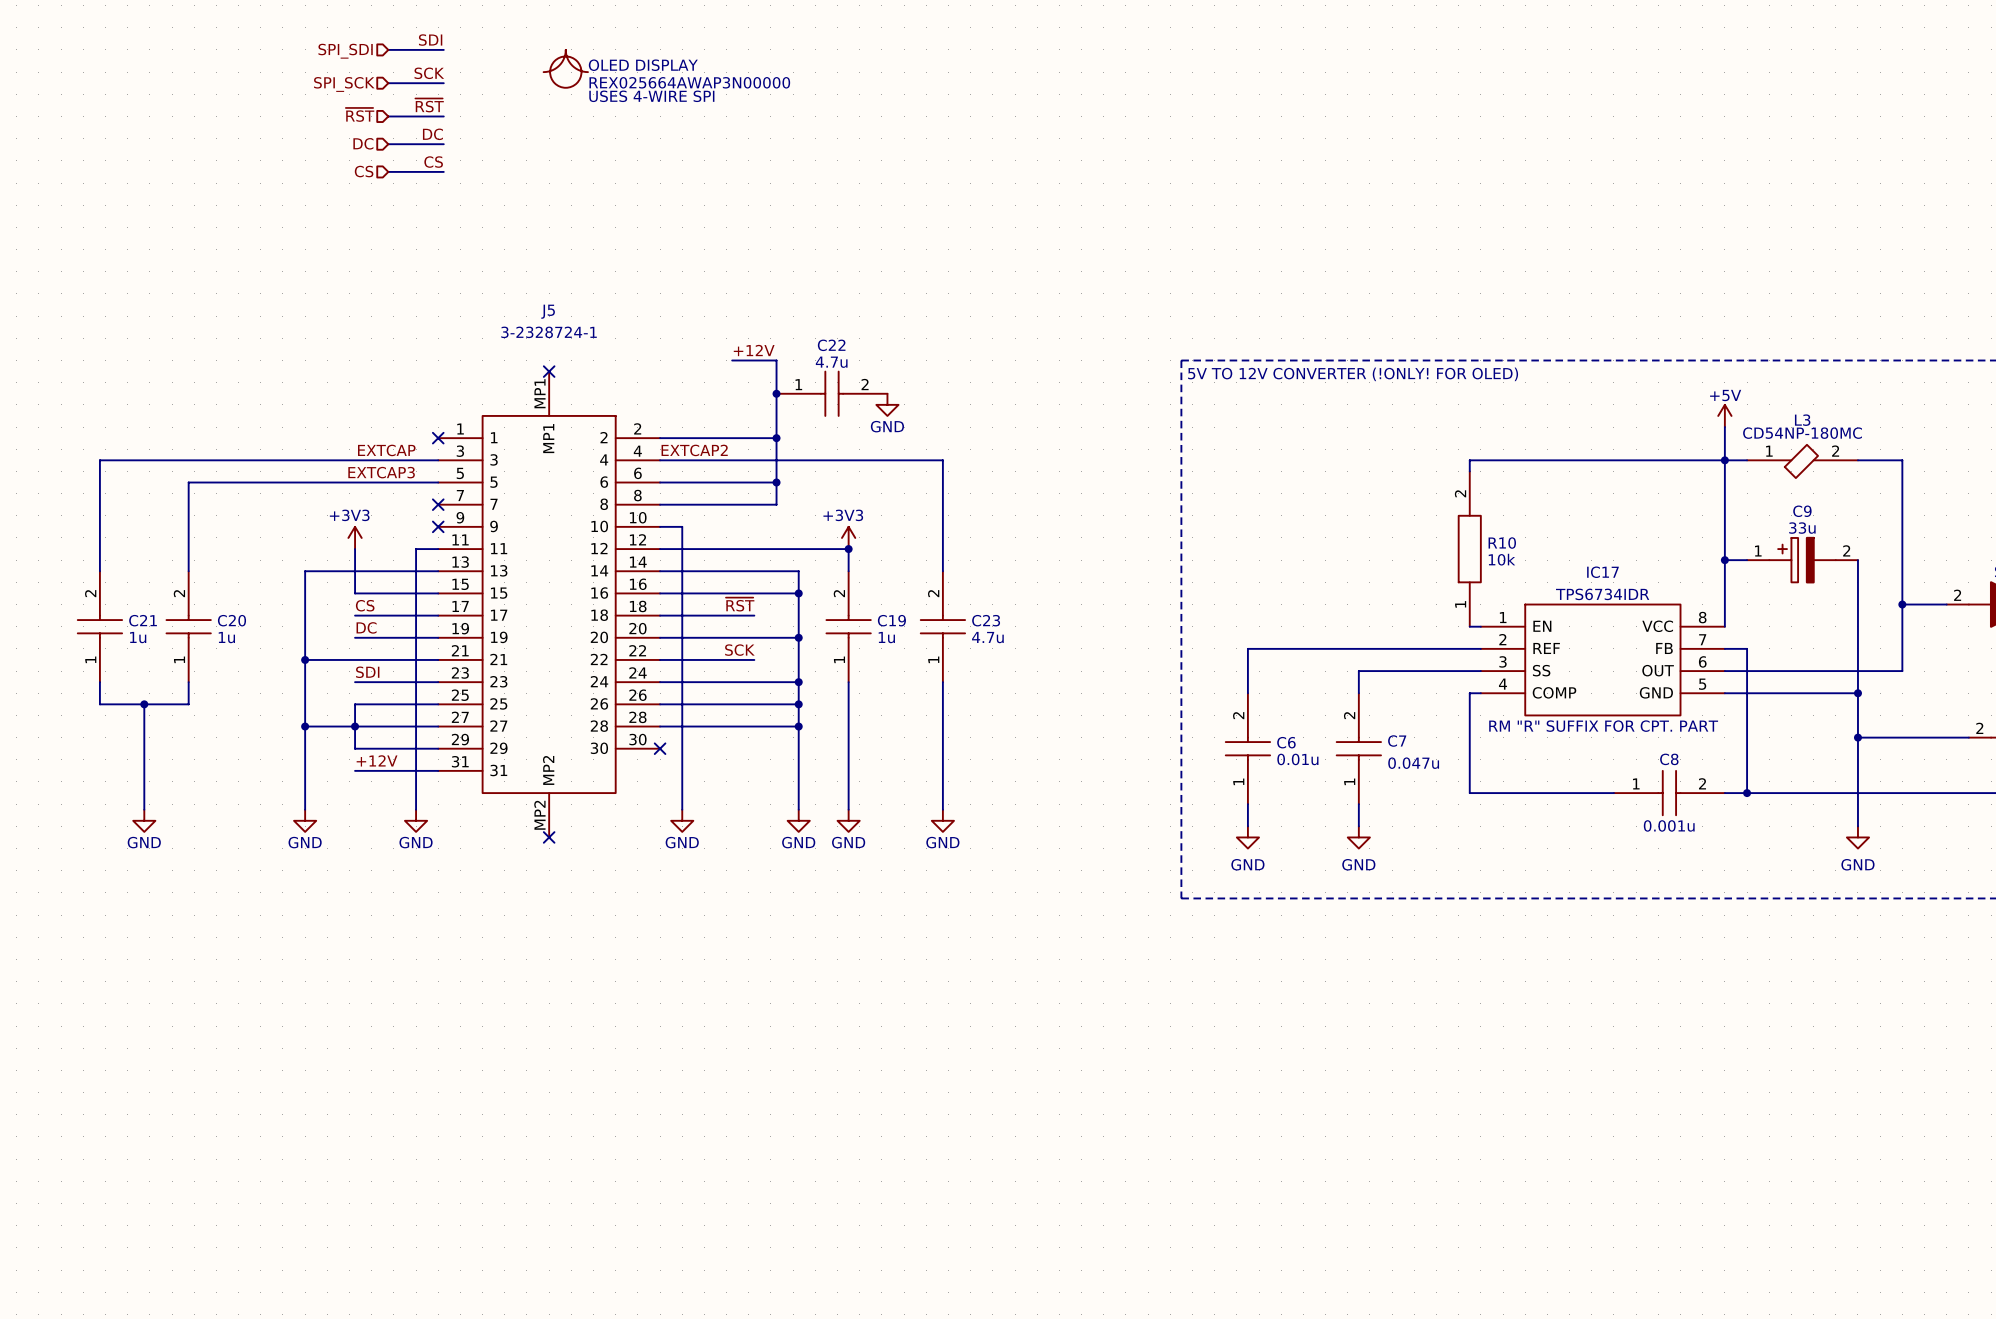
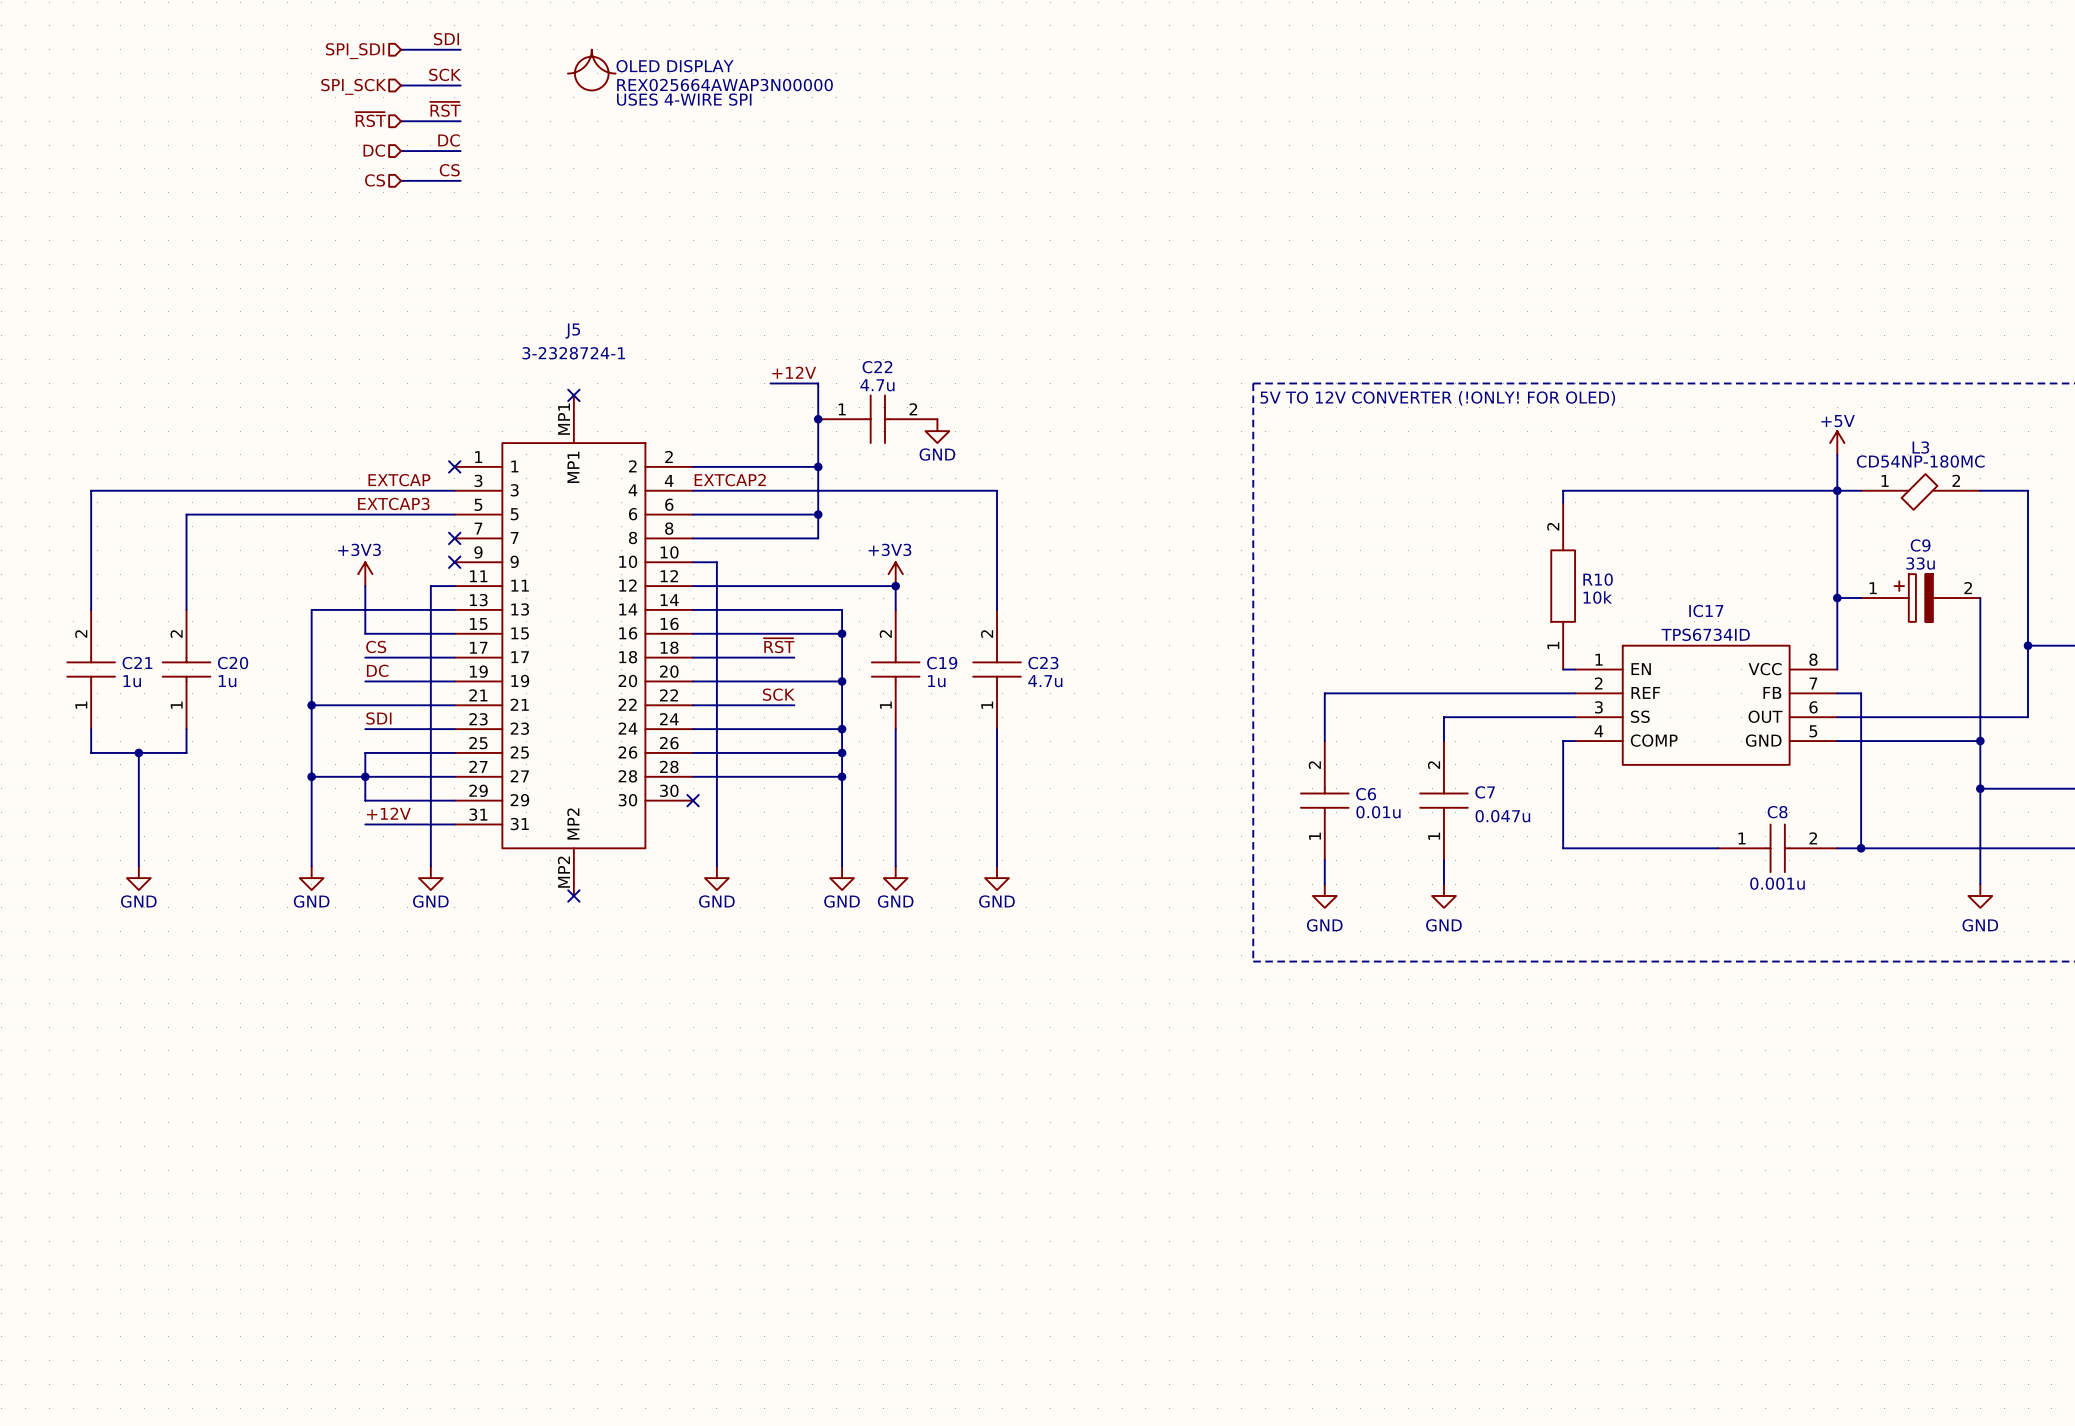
IC17 value: TPS6734IDR (1602, 594) -> TPS6734ID (1705, 634)
IC17 text: RM "R" SUFFIX FOR CPT. PART (1603, 726) -> none

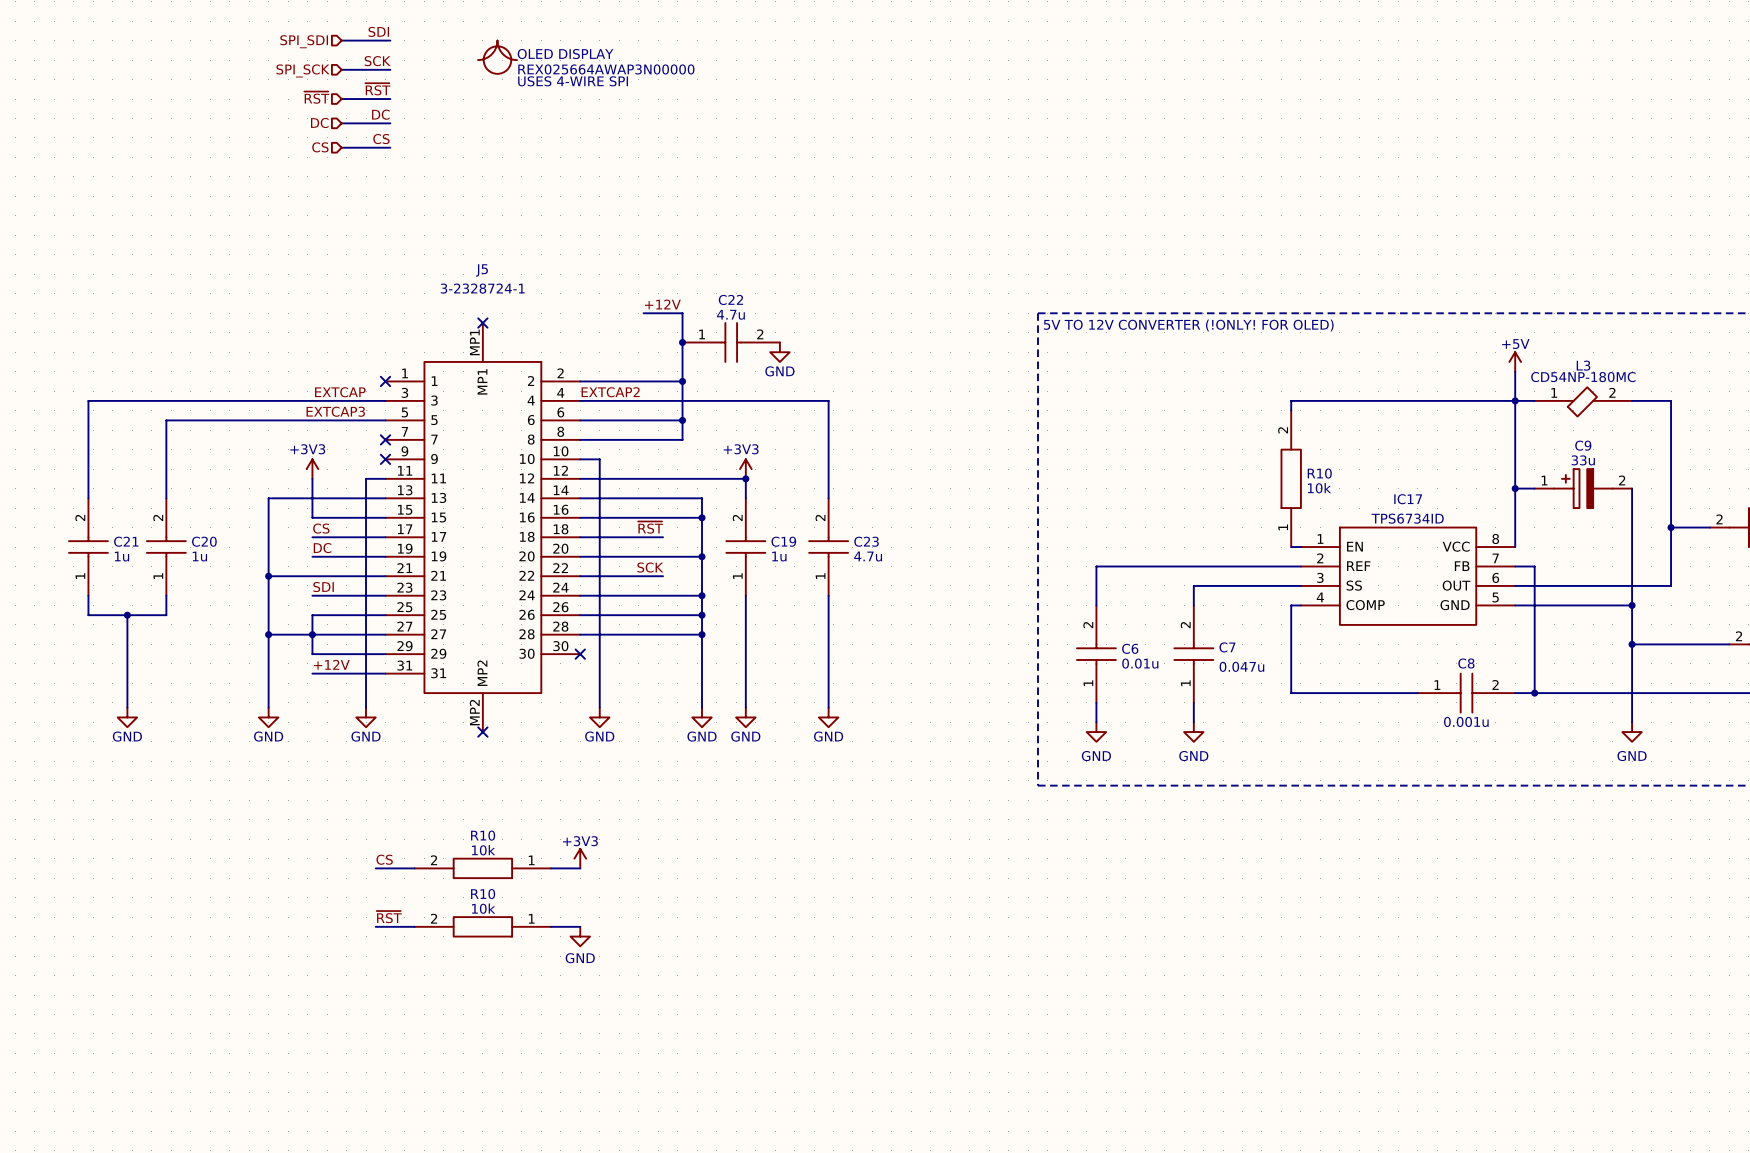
power symbol: none -> +3V3 (580, 858)
label: none -> CS (384, 859)
wire: none -> (375, 868) (414, 868)
R10: none -> 10k (482, 868)
wire: none -> (551, 868) (580, 868)
label: none -> ~{RST} (389, 917)
wire: none -> (375, 926) (414, 926)
R10: none -> 10k (482, 926)
wire: none -> (551, 926) (580, 926)
power symbol: none -> GND (580, 936)

